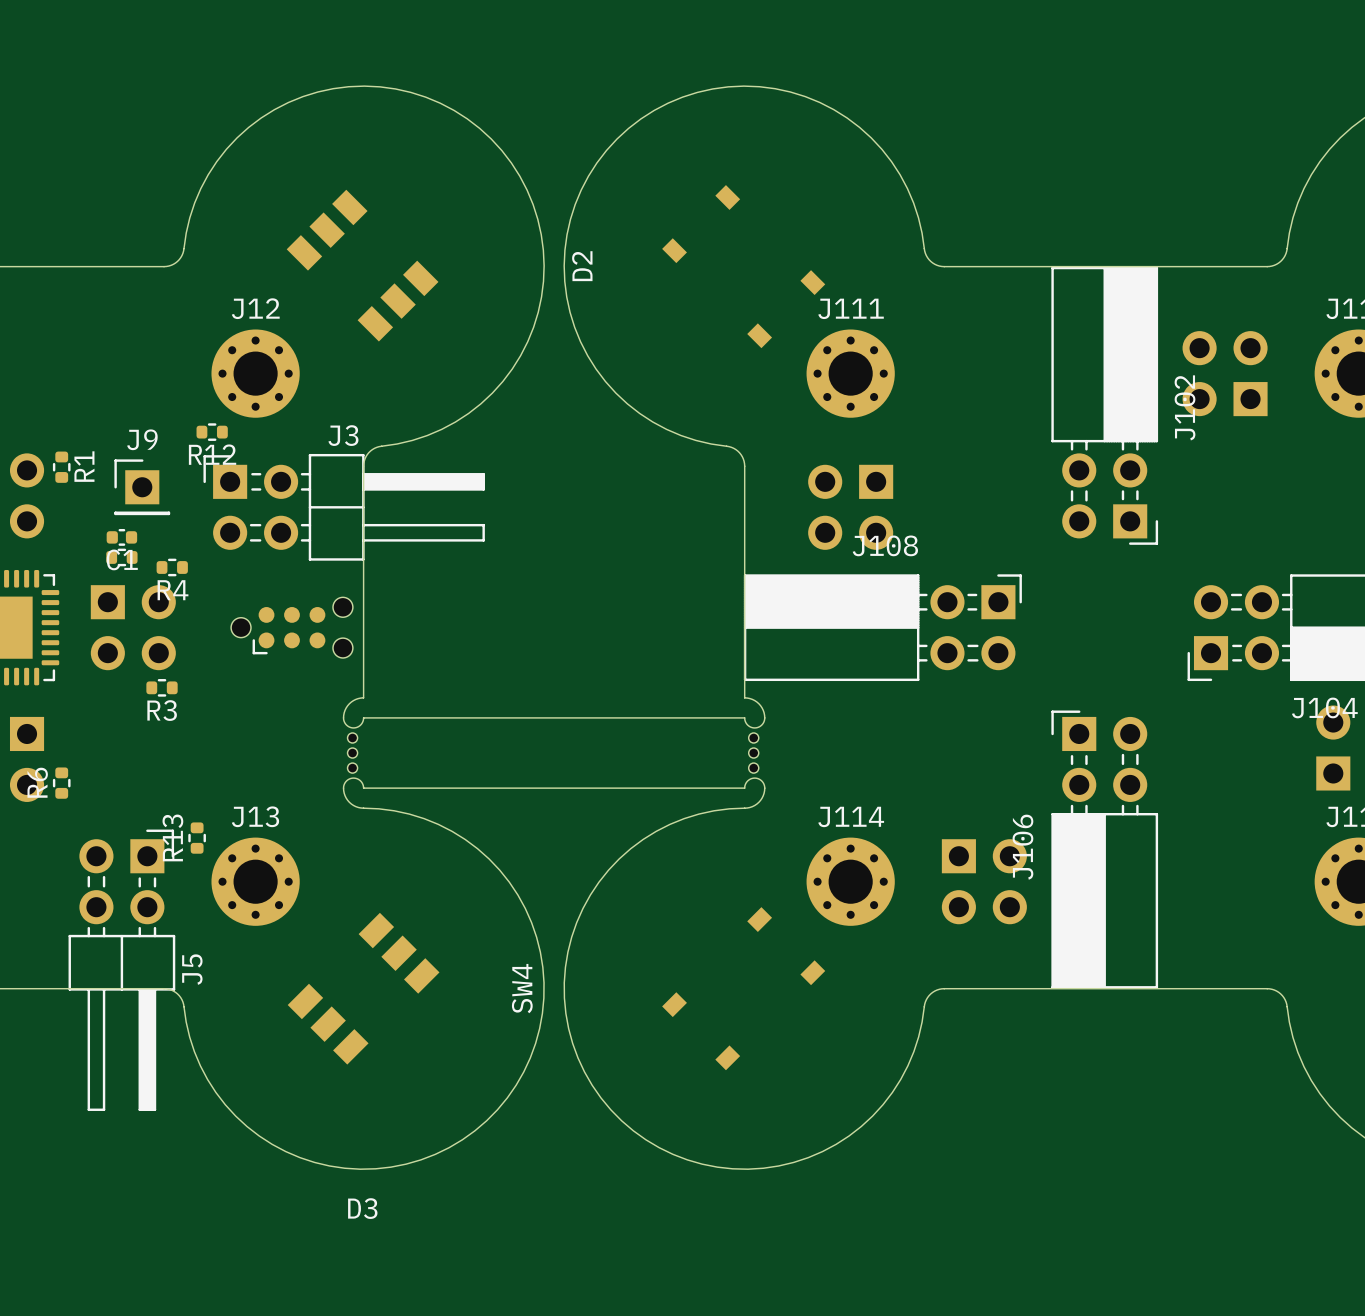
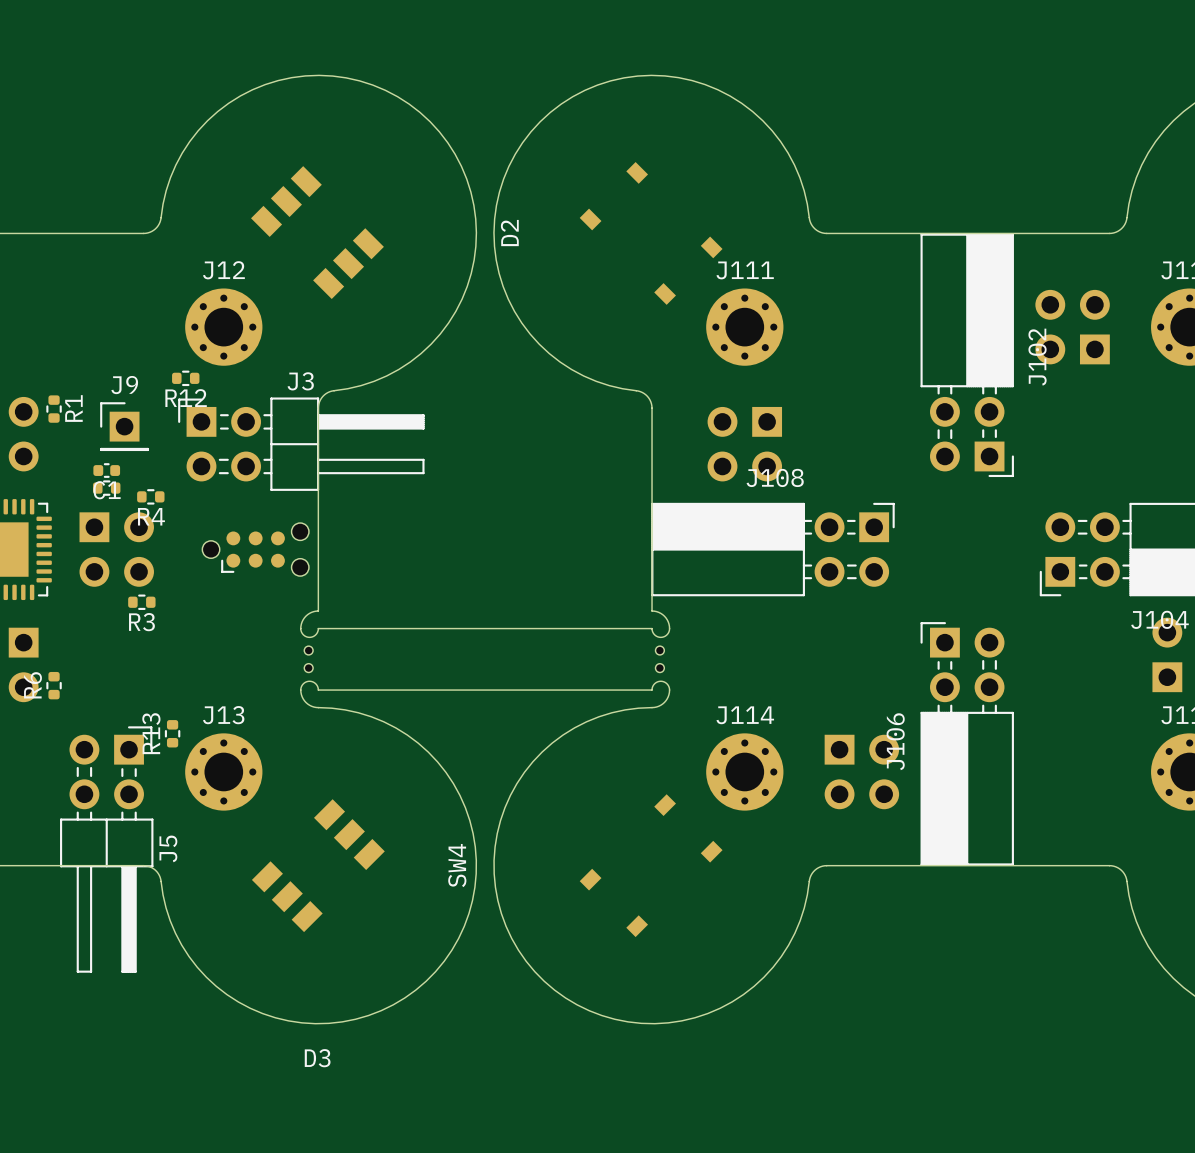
part footprint: [347, 732, 358, 774] -> [304, 646, 314, 673]
part footprint: [748, 732, 759, 774] -> [655, 646, 665, 673]

